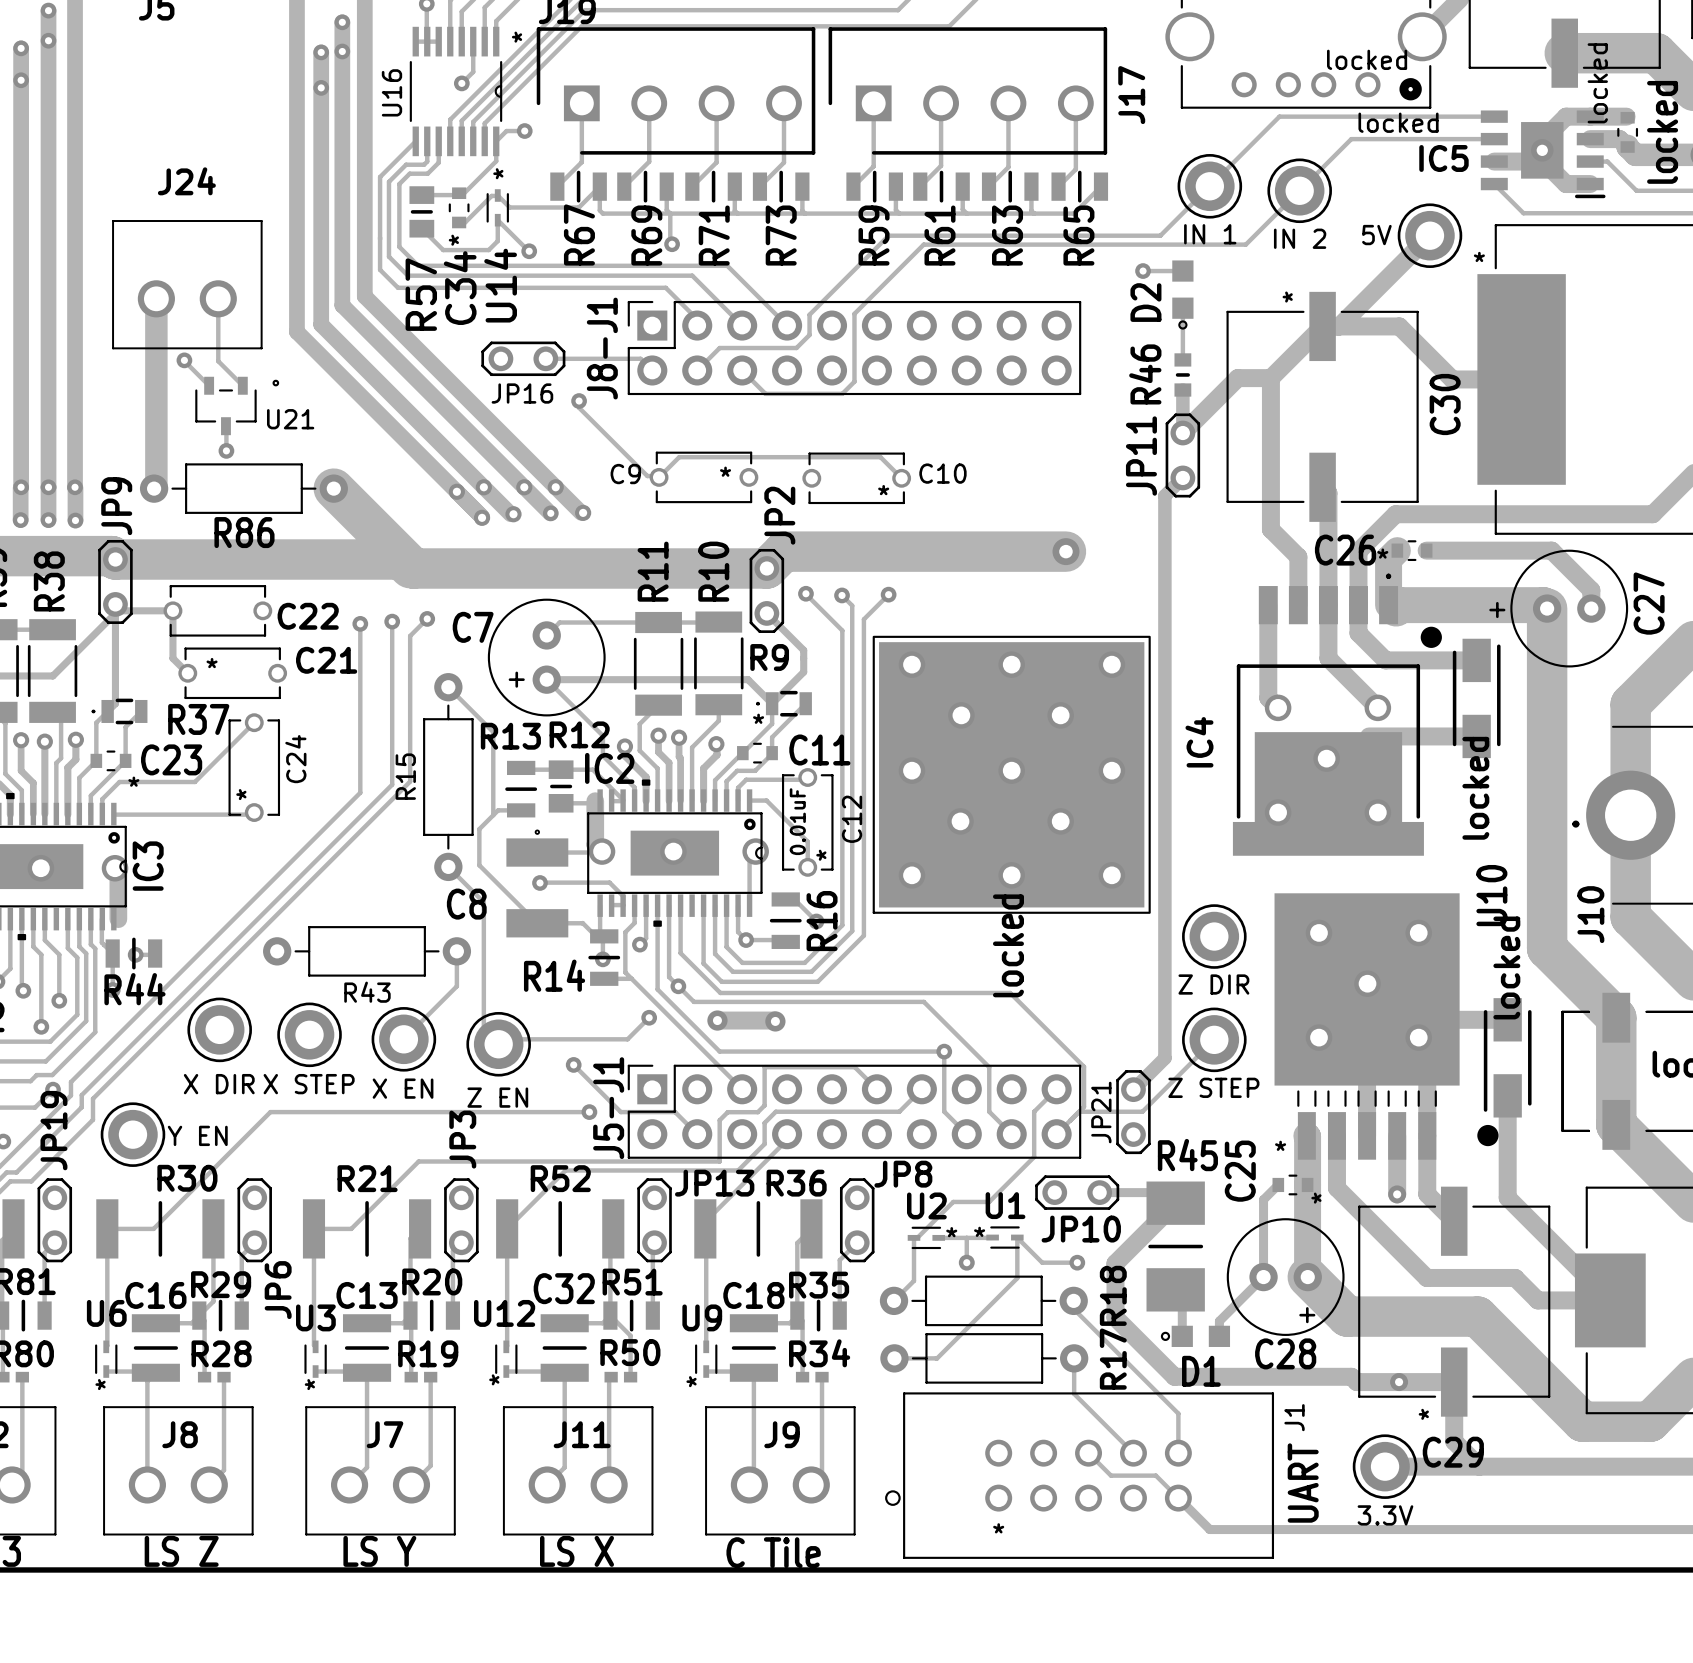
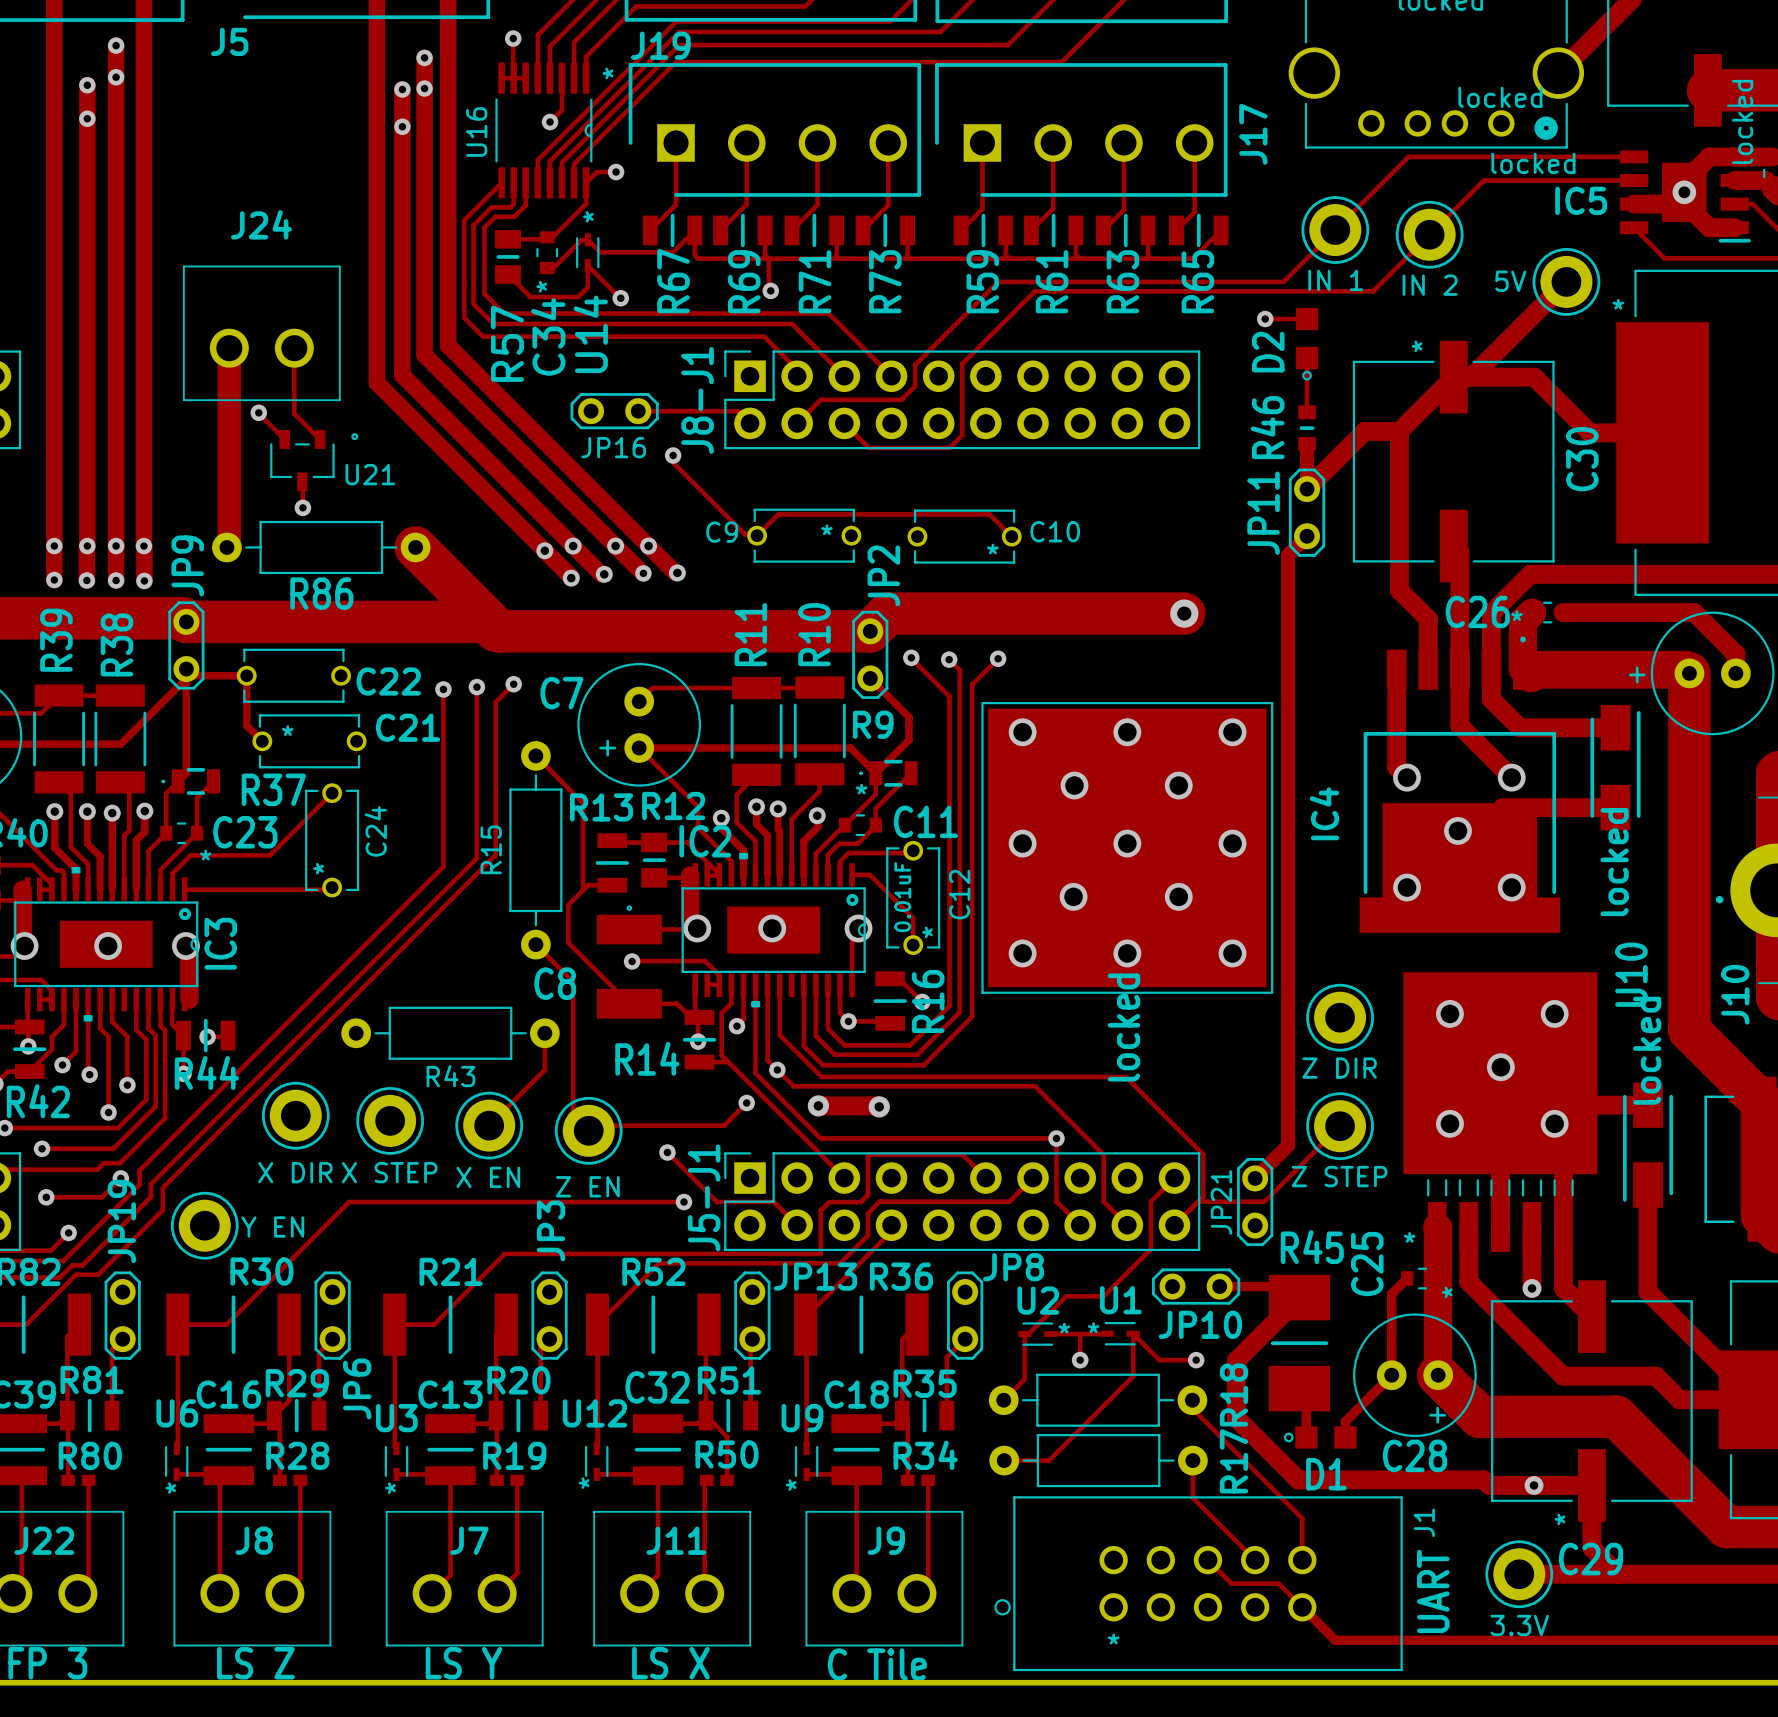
locked footprint: [1420, 626, 1501, 759] -> [1590, 705, 1641, 831]
locked footprint: [1477, 998, 1532, 1147] -> [1622, 1082, 1674, 1208]

